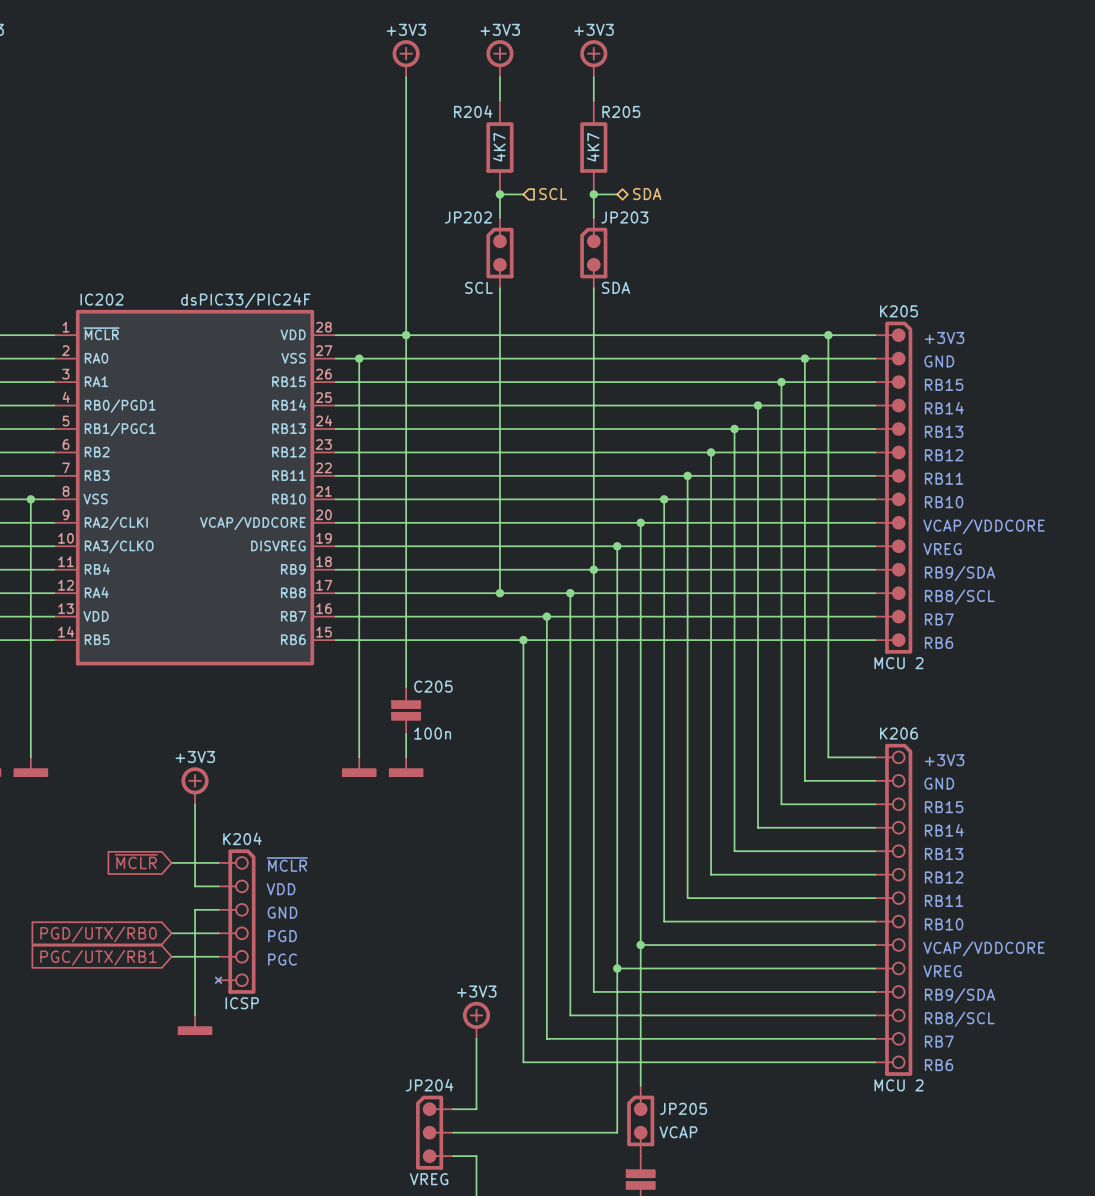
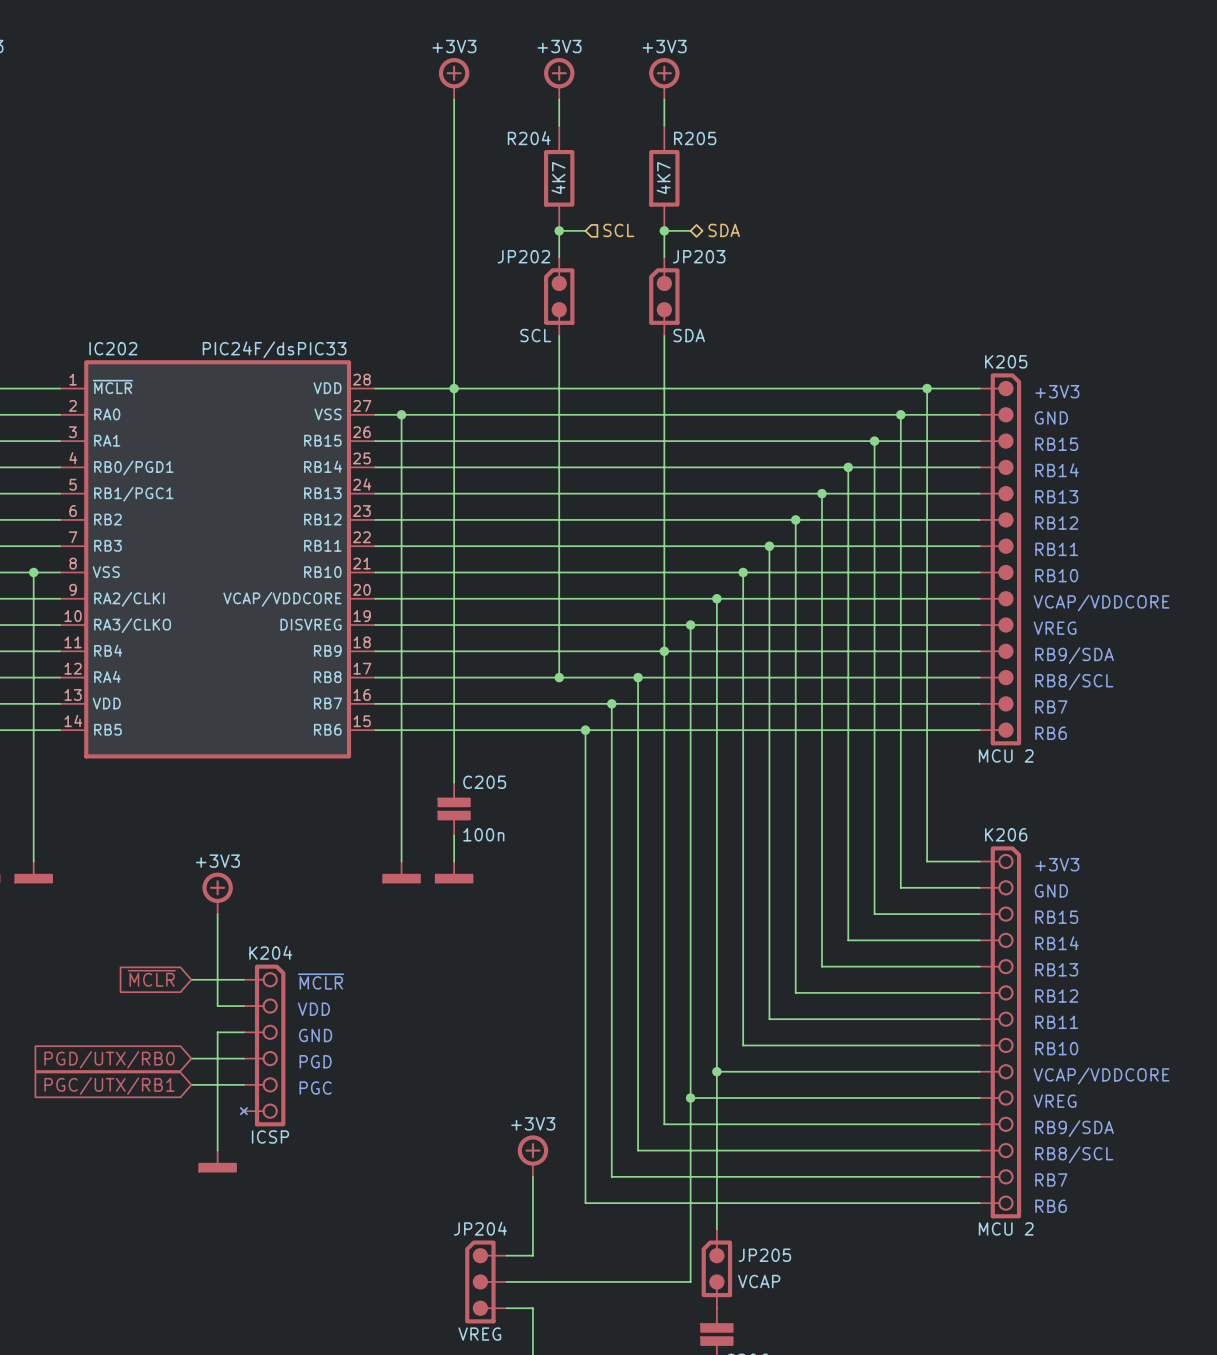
IC202 text: none -> PIC24F/dsPIC33 (274, 349)
IC202 value: dsPIC33/PIC24F (245, 300) -> none

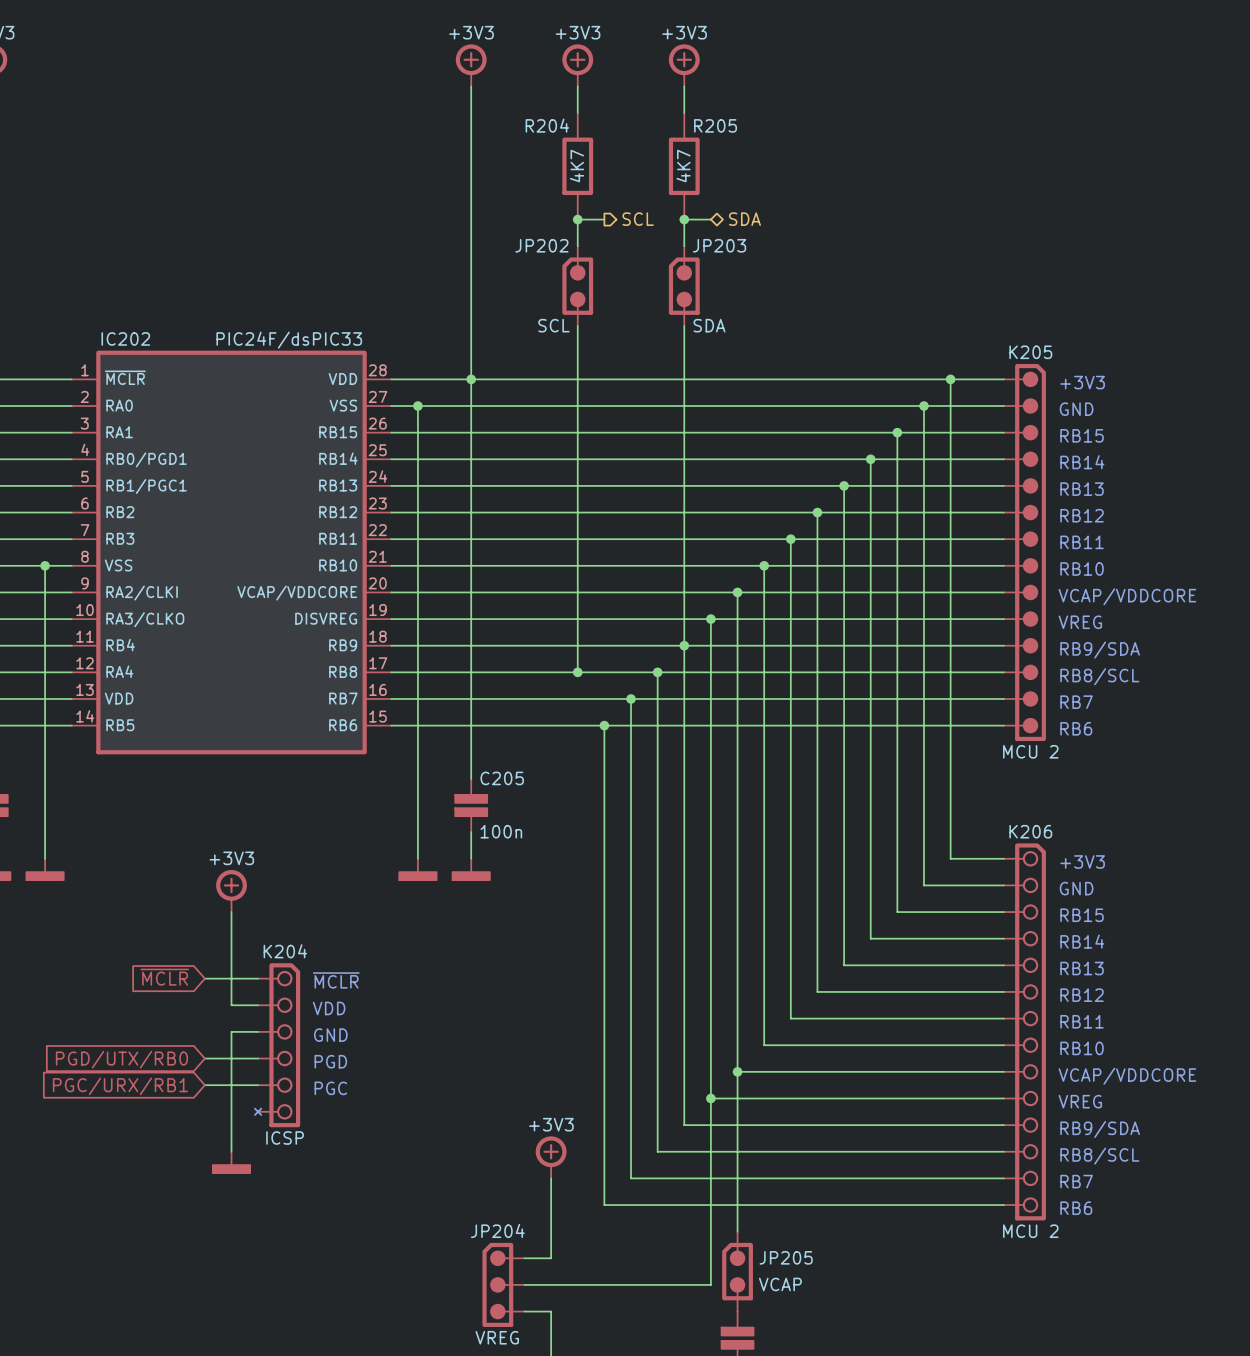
hierarchical label shape: input (618, 230) -> output (638, 219)
global label: PGC/UTX/RB1 (109, 1086) -> PGC/URX/RB1 (120, 1086)

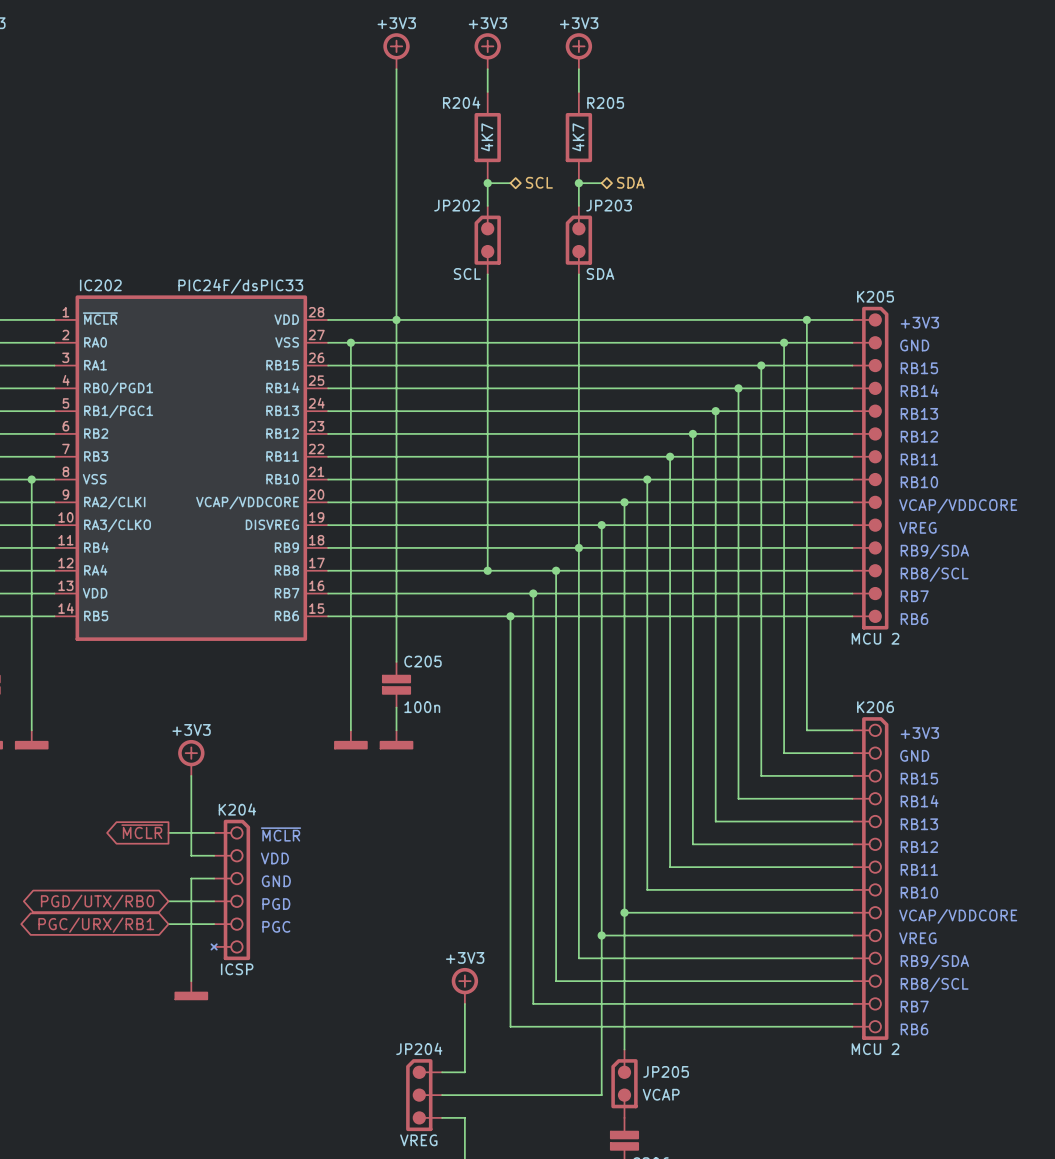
hierarchical label shape: output (638, 219) -> bidirectional (539, 182)
global label shape: input (164, 977) -> output (142, 831)
global label shape: input (121, 1059) -> bidirectional (97, 902)
global label shape: input (120, 1086) -> bidirectional (96, 925)

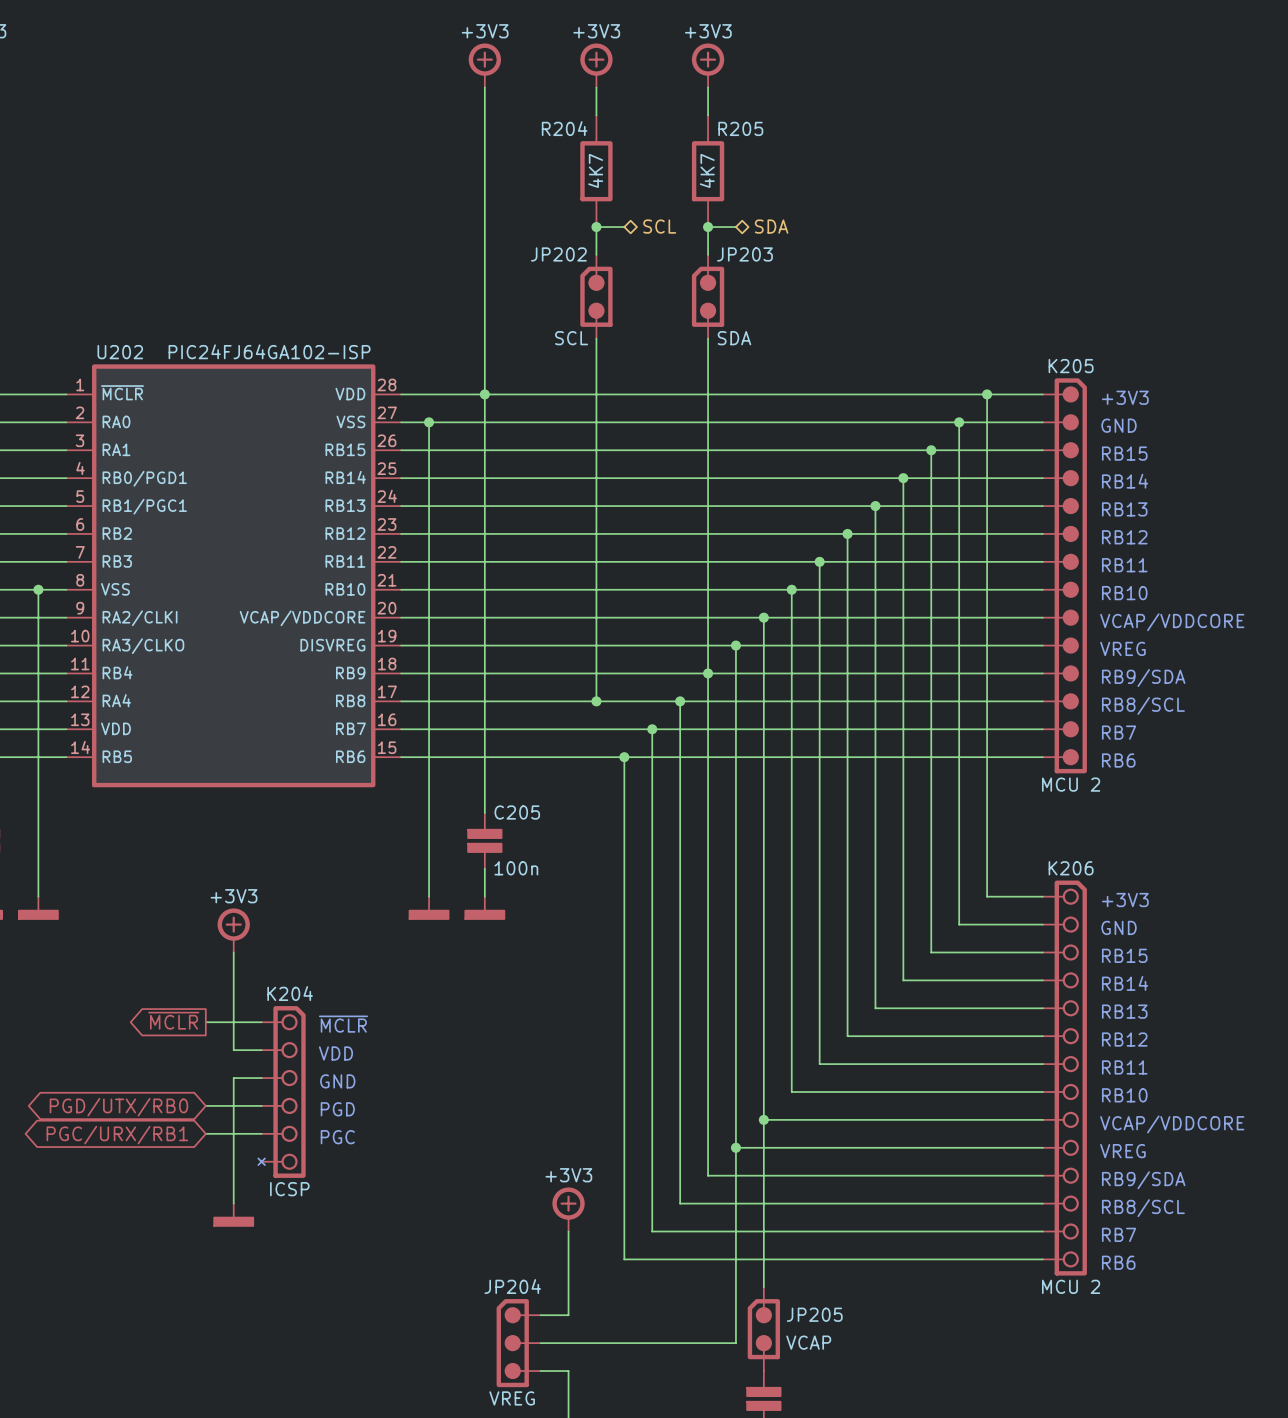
IC202 name: IC202 (100, 285) -> U202 (120, 352)
IC202 text: PIC24F/dsPIC33 (240, 286) -> PIC24FJ64GA102-ISP (269, 351)

